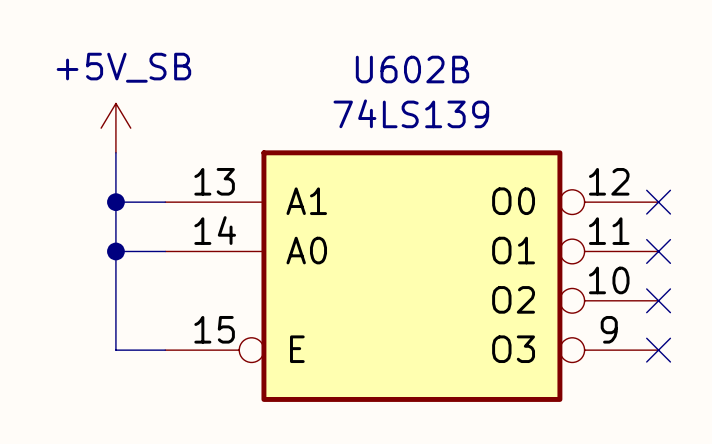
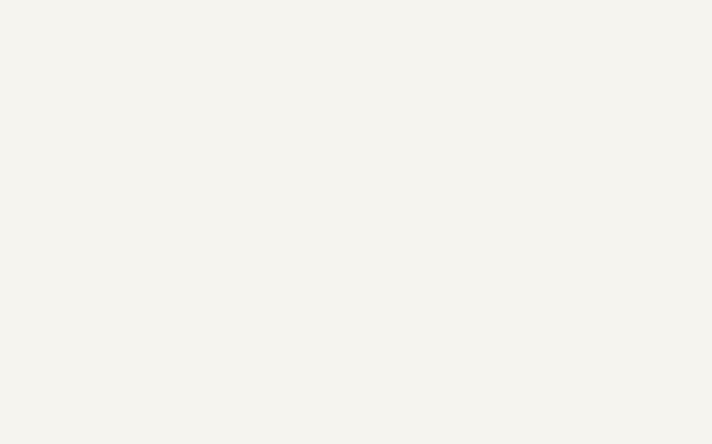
power symbol: +5V_SB (115, 128) -> none
wire: (115, 152) (115, 350) (165, 350) -> none
wire: (115, 202) (165, 202) -> none
junction: (115, 202) -> none
no-connect mark: (658, 202) -> none
wire: (115, 251) (165, 251) -> none
junction: (115, 251) -> none
no-connect mark: (658, 251) -> none
U602B: 74LS139 (411, 276) -> none
no-connect mark: (658, 300) -> none
no-connect mark: (658, 350) -> none

